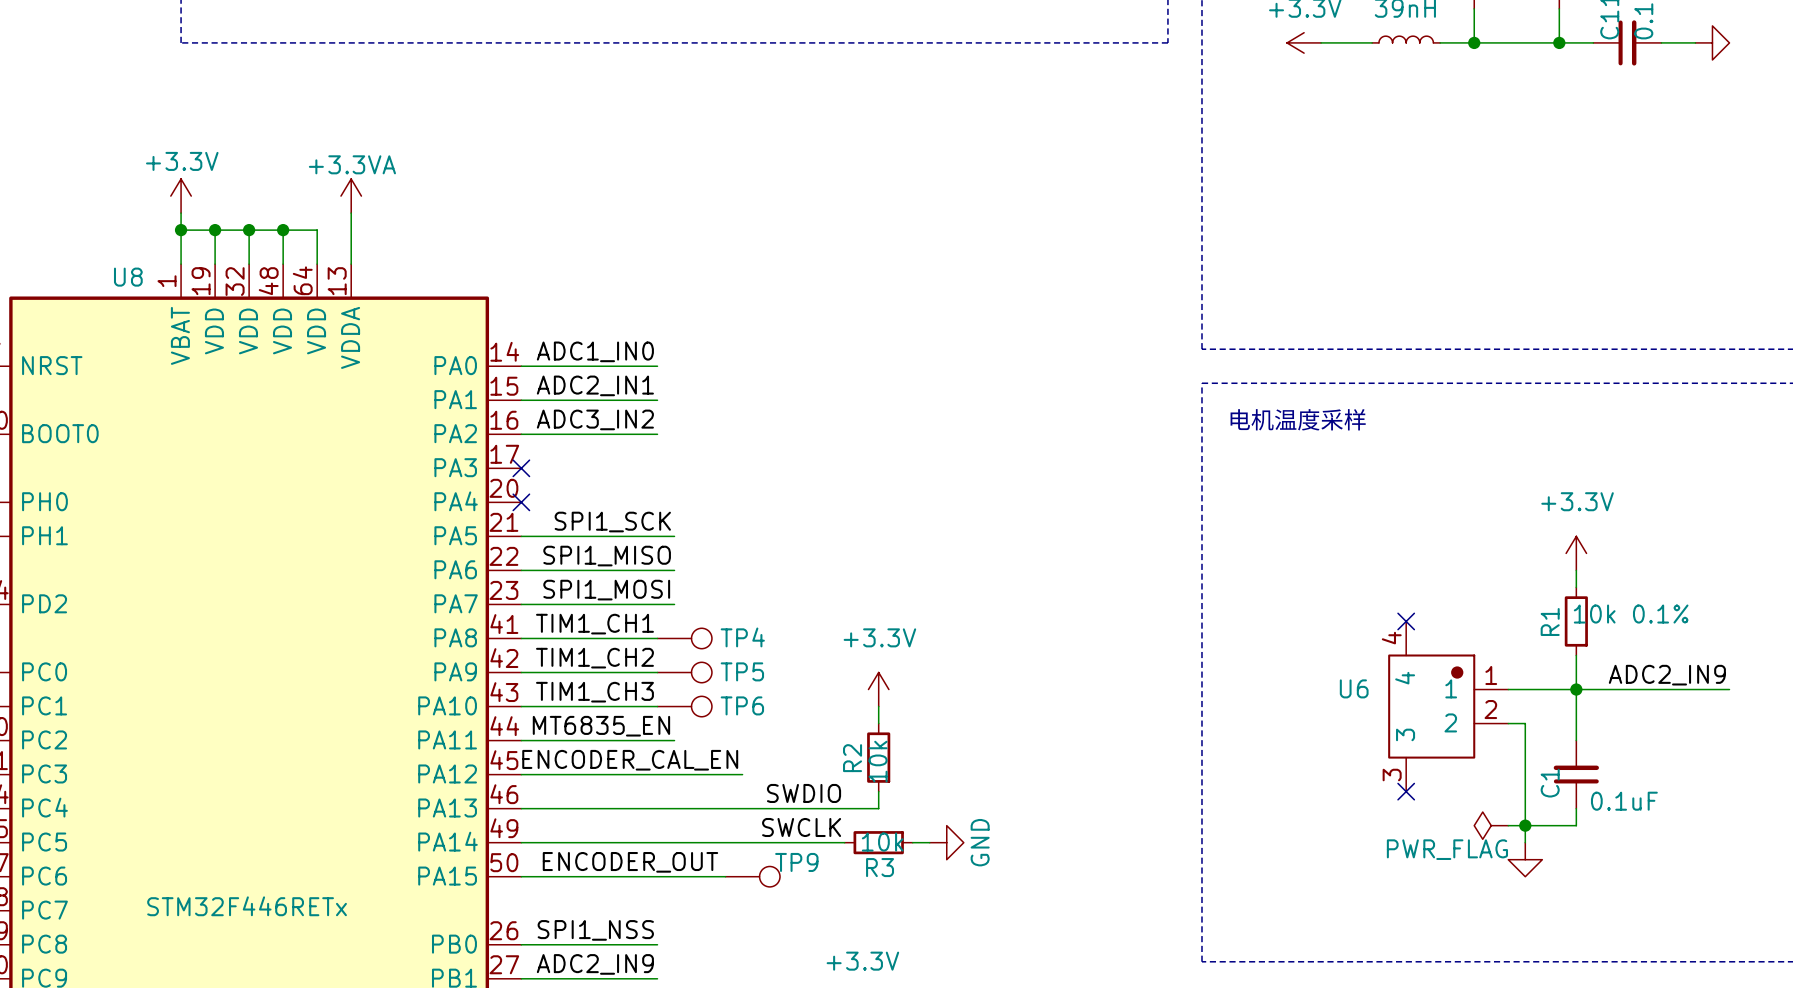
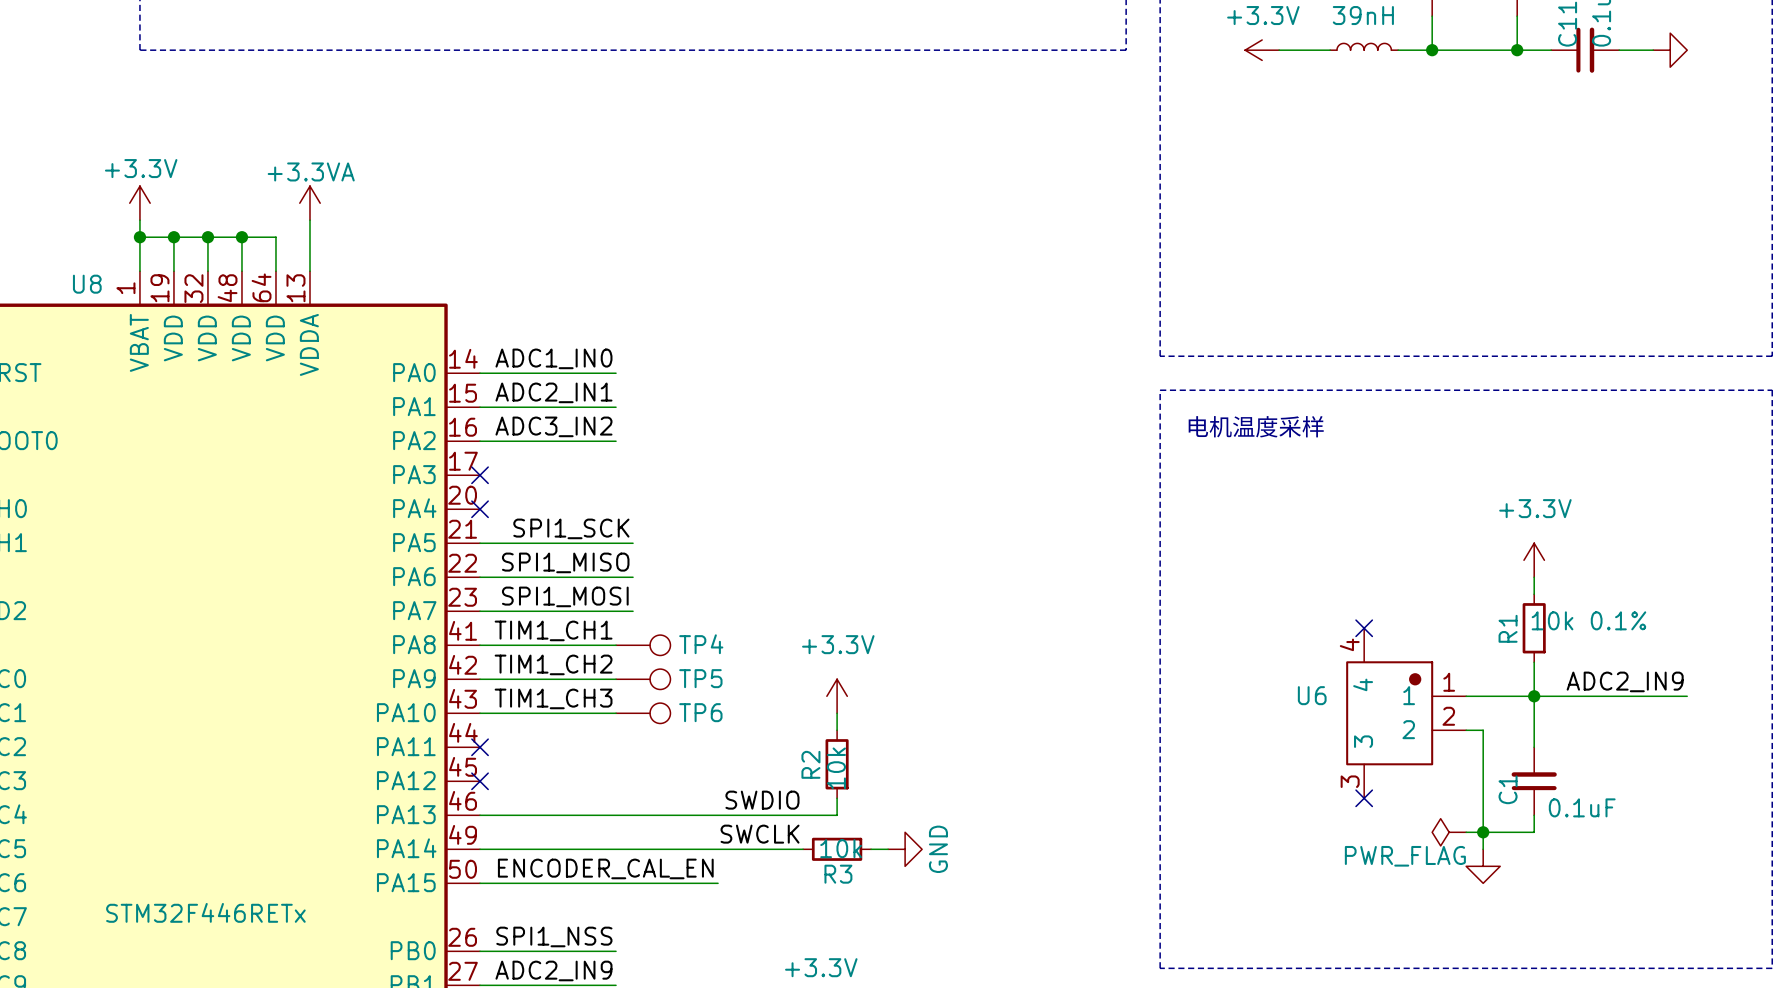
label: MT6835_EN (601, 726) -> none
wire: (521, 740) (674, 740) -> none
no-connect mark: none -> (480, 747)
label position: ENCODER_CAL_EN (630, 760) -> ENCODER_CAL_EN (605, 868)
wire: (521, 774) (742, 774) -> none
no-connect mark: none -> (480, 781)
label: ENCODER_OUT (630, 862) -> none
TP9: (752, 876) -> none

